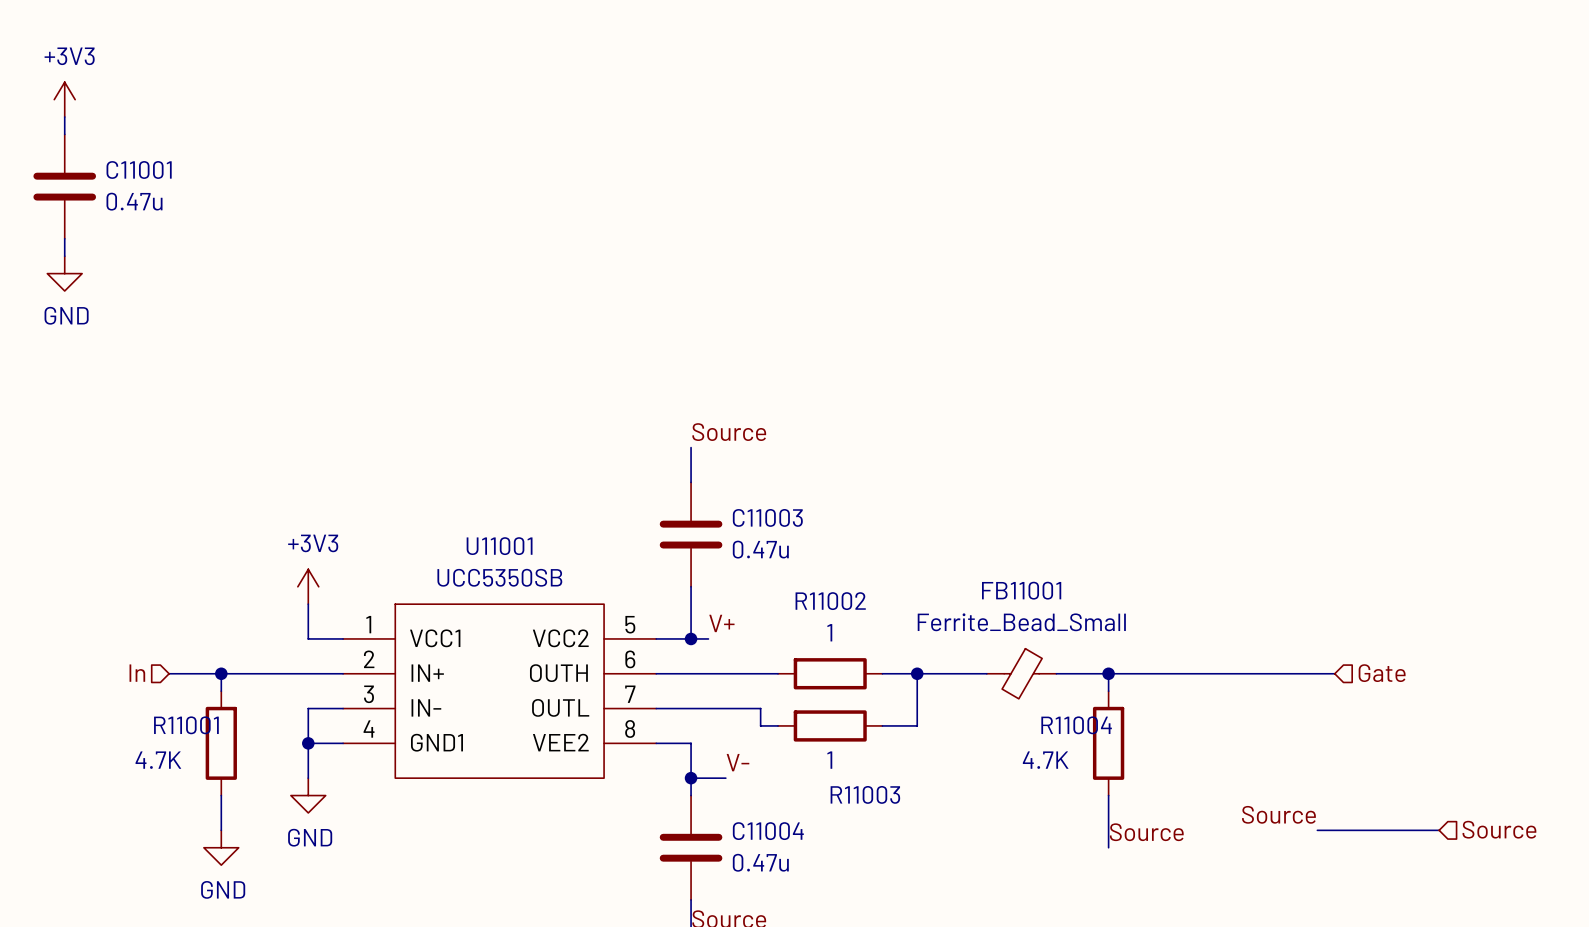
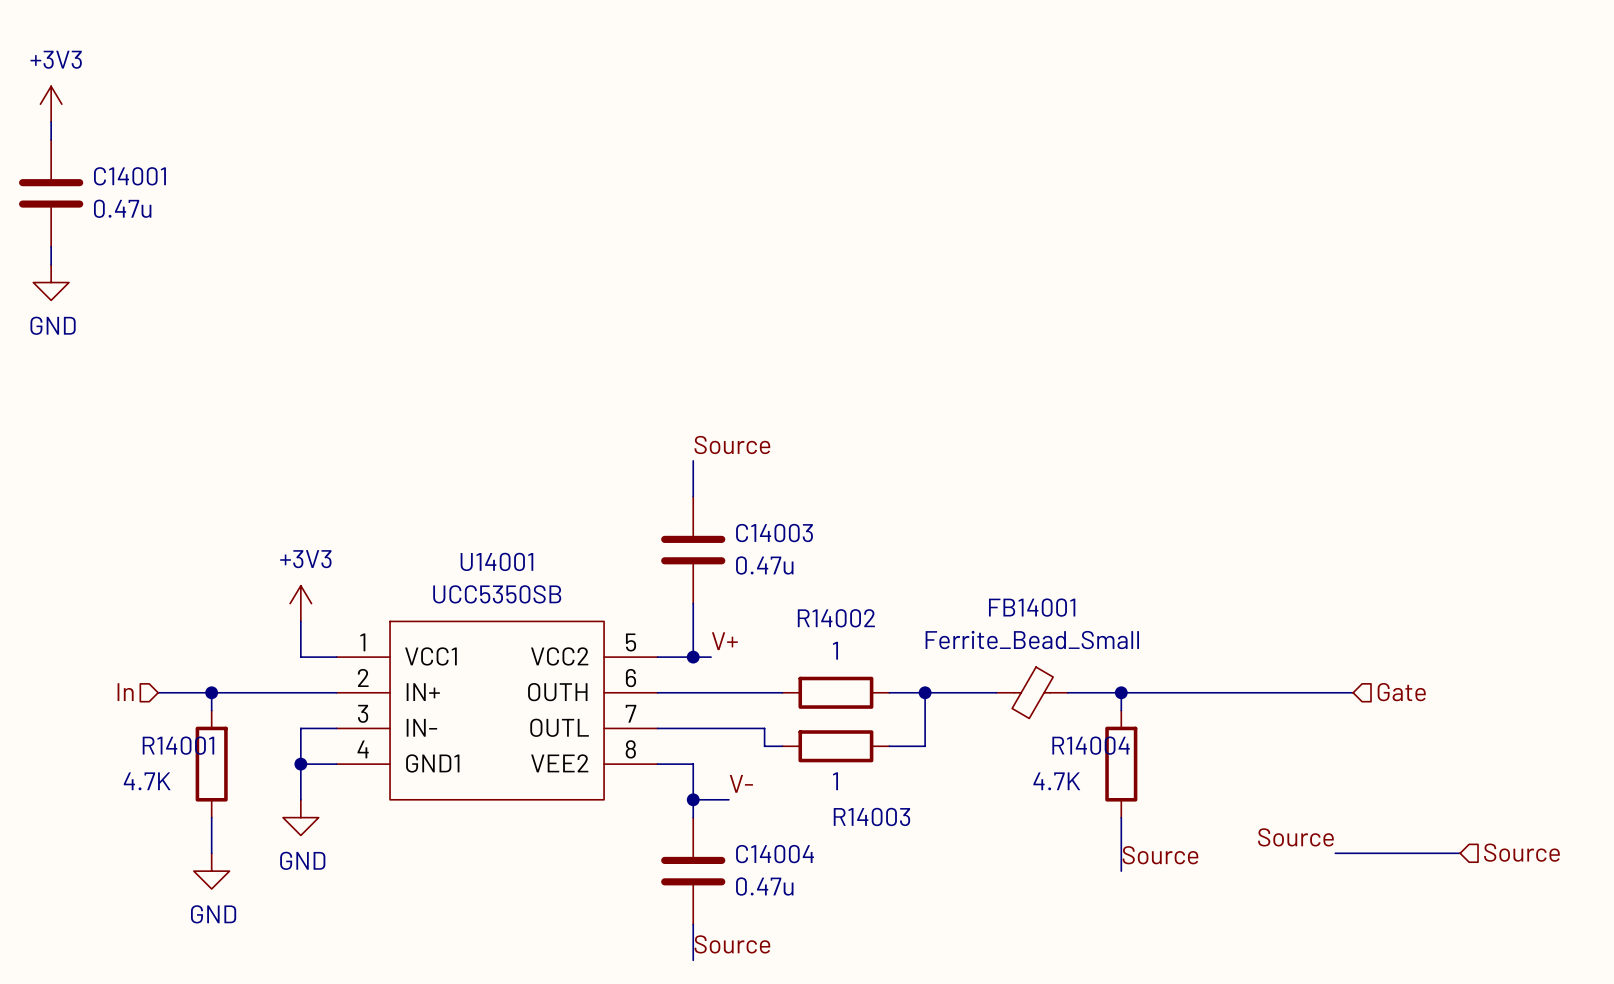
C11001 name: C11001 (139, 169) -> C14001 (129, 176)
C11003 name: C11003 (767, 517) -> C14003 (774, 533)
U11001 name: U11001 (499, 546) -> U14001 (496, 561)
FB11001 name: FB11001 (1021, 590) -> FB14001 (1032, 607)
R11002 name: R11002 (830, 601) -> R14002 (836, 618)
R11001 name: R11001 (186, 725) -> R14001 (178, 745)
R11004 name: R11004 (1076, 725) -> R14004 (1091, 745)
R11003 name: R11003 (865, 794) -> R14003 (871, 816)
C11004 name: C11004 (768, 831) -> C14004 (775, 854)

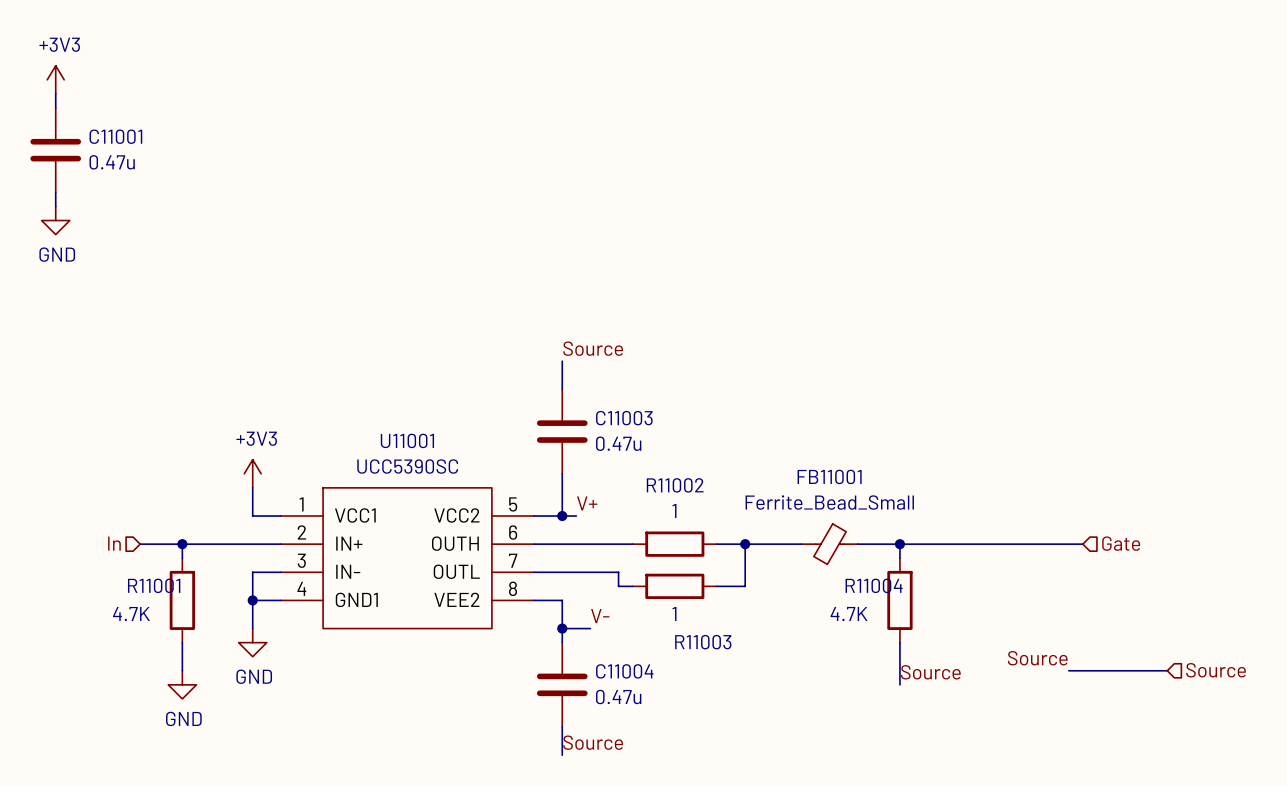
C14001 name: C14001 (129, 176) -> C11001 (115, 136)
C14003 name: C14003 (774, 533) -> C11003 (624, 418)
U14001 name: U14001 (496, 561) -> U11001 (407, 440)
U14001 value: UCC5350SB (497, 594) -> UCC5390SC (407, 466)
FB14001 name: FB14001 (1032, 607) -> FB11001 (829, 476)
R14002 name: R14002 (836, 618) -> R11002 (675, 485)
R14001 name: R14001 (178, 745) -> R11001 (154, 585)
R14004 name: R14004 (1091, 745) -> R11004 (874, 585)
R14003 name: R14003 (871, 816) -> R11003 (703, 642)
C14004 name: C14004 (775, 854) -> C11004 (624, 671)

